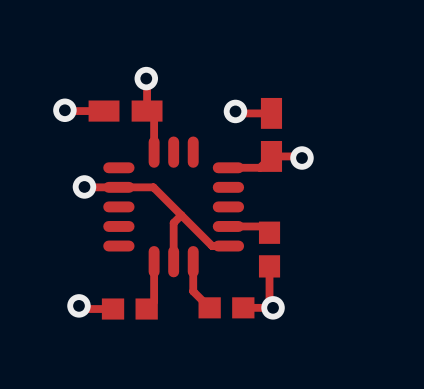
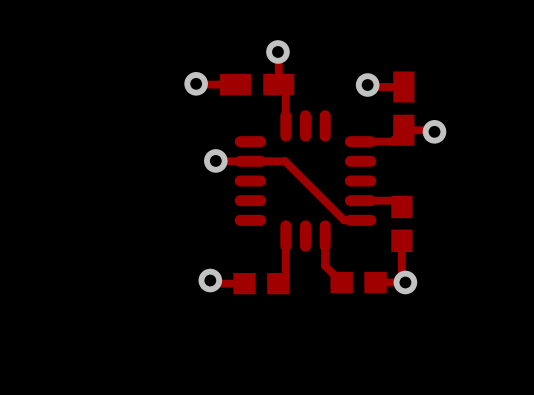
top track: (181, 215) (173, 222) (173, 261) -> none

